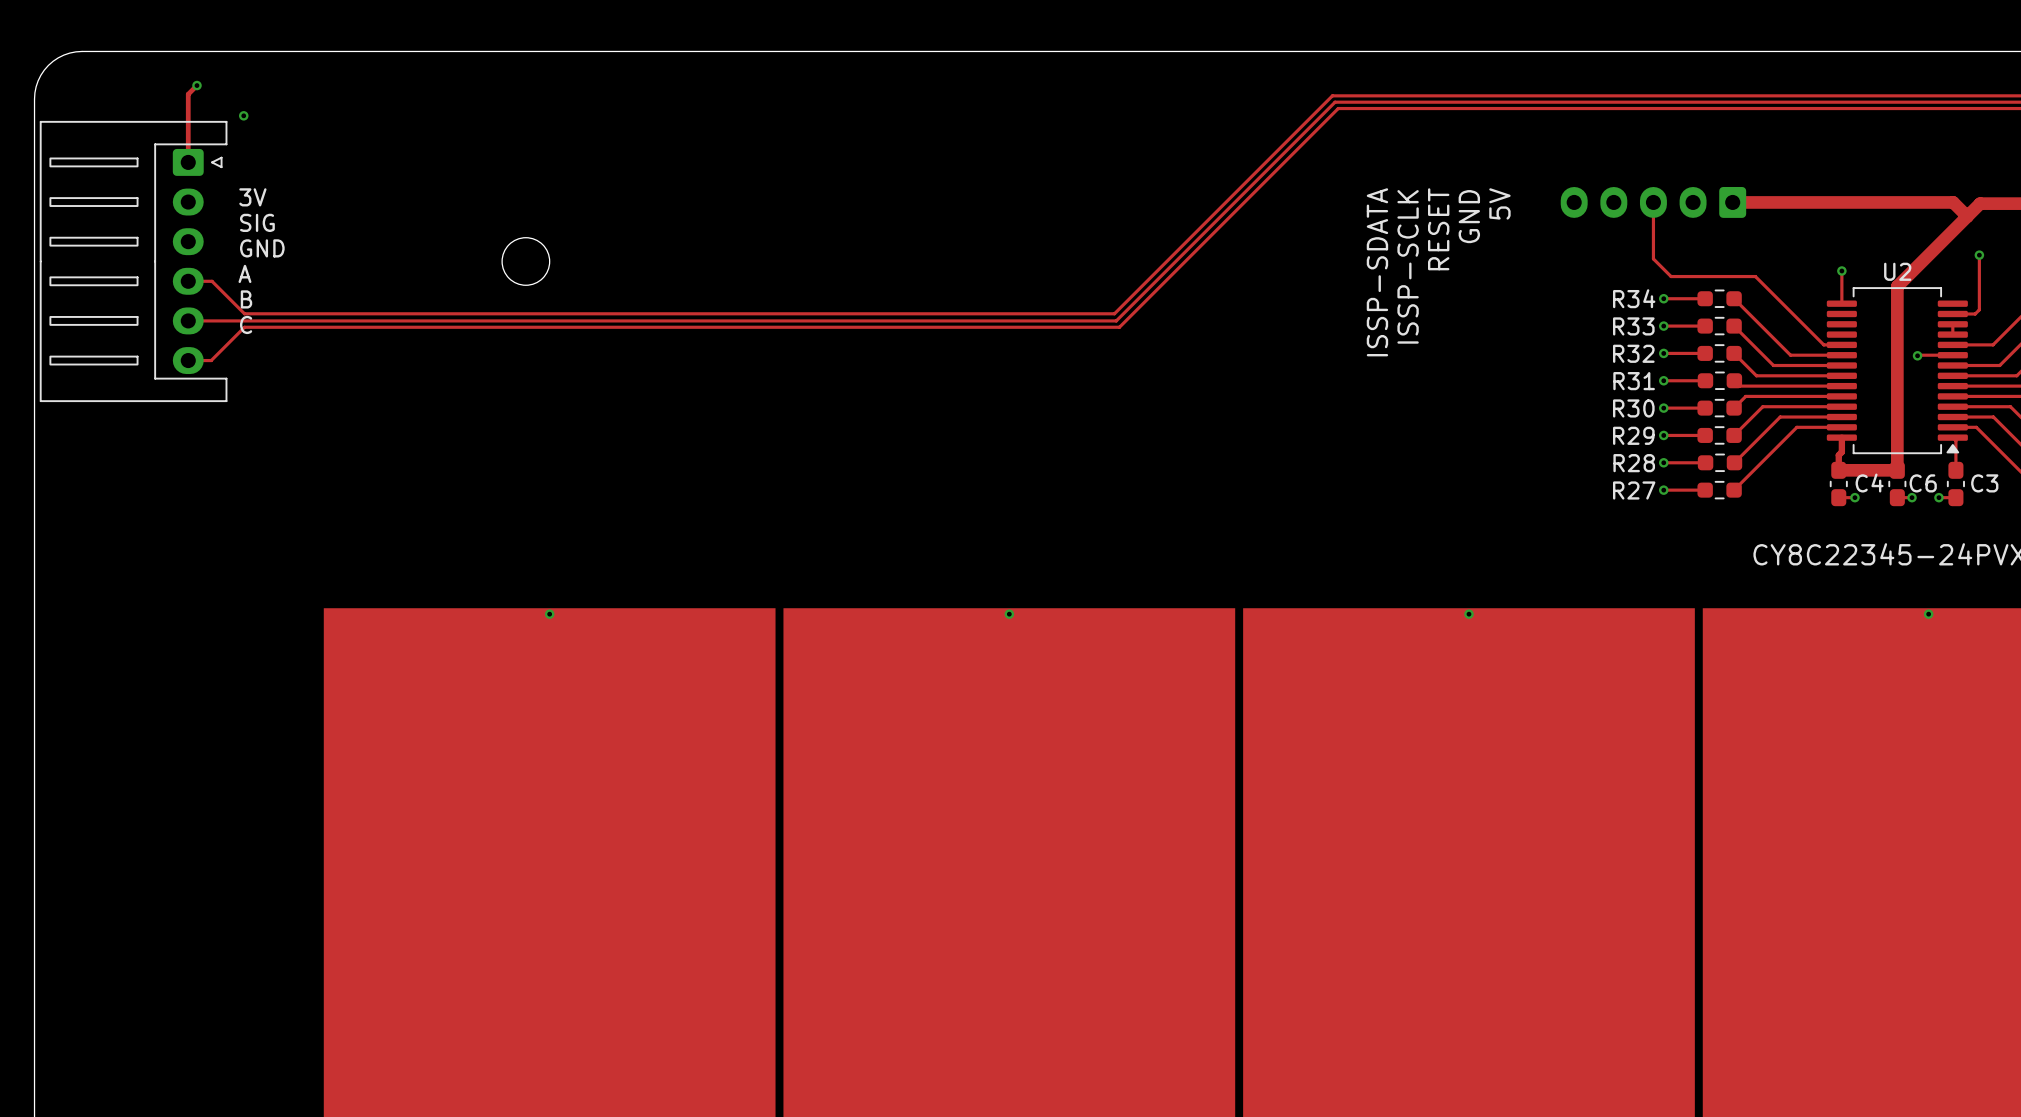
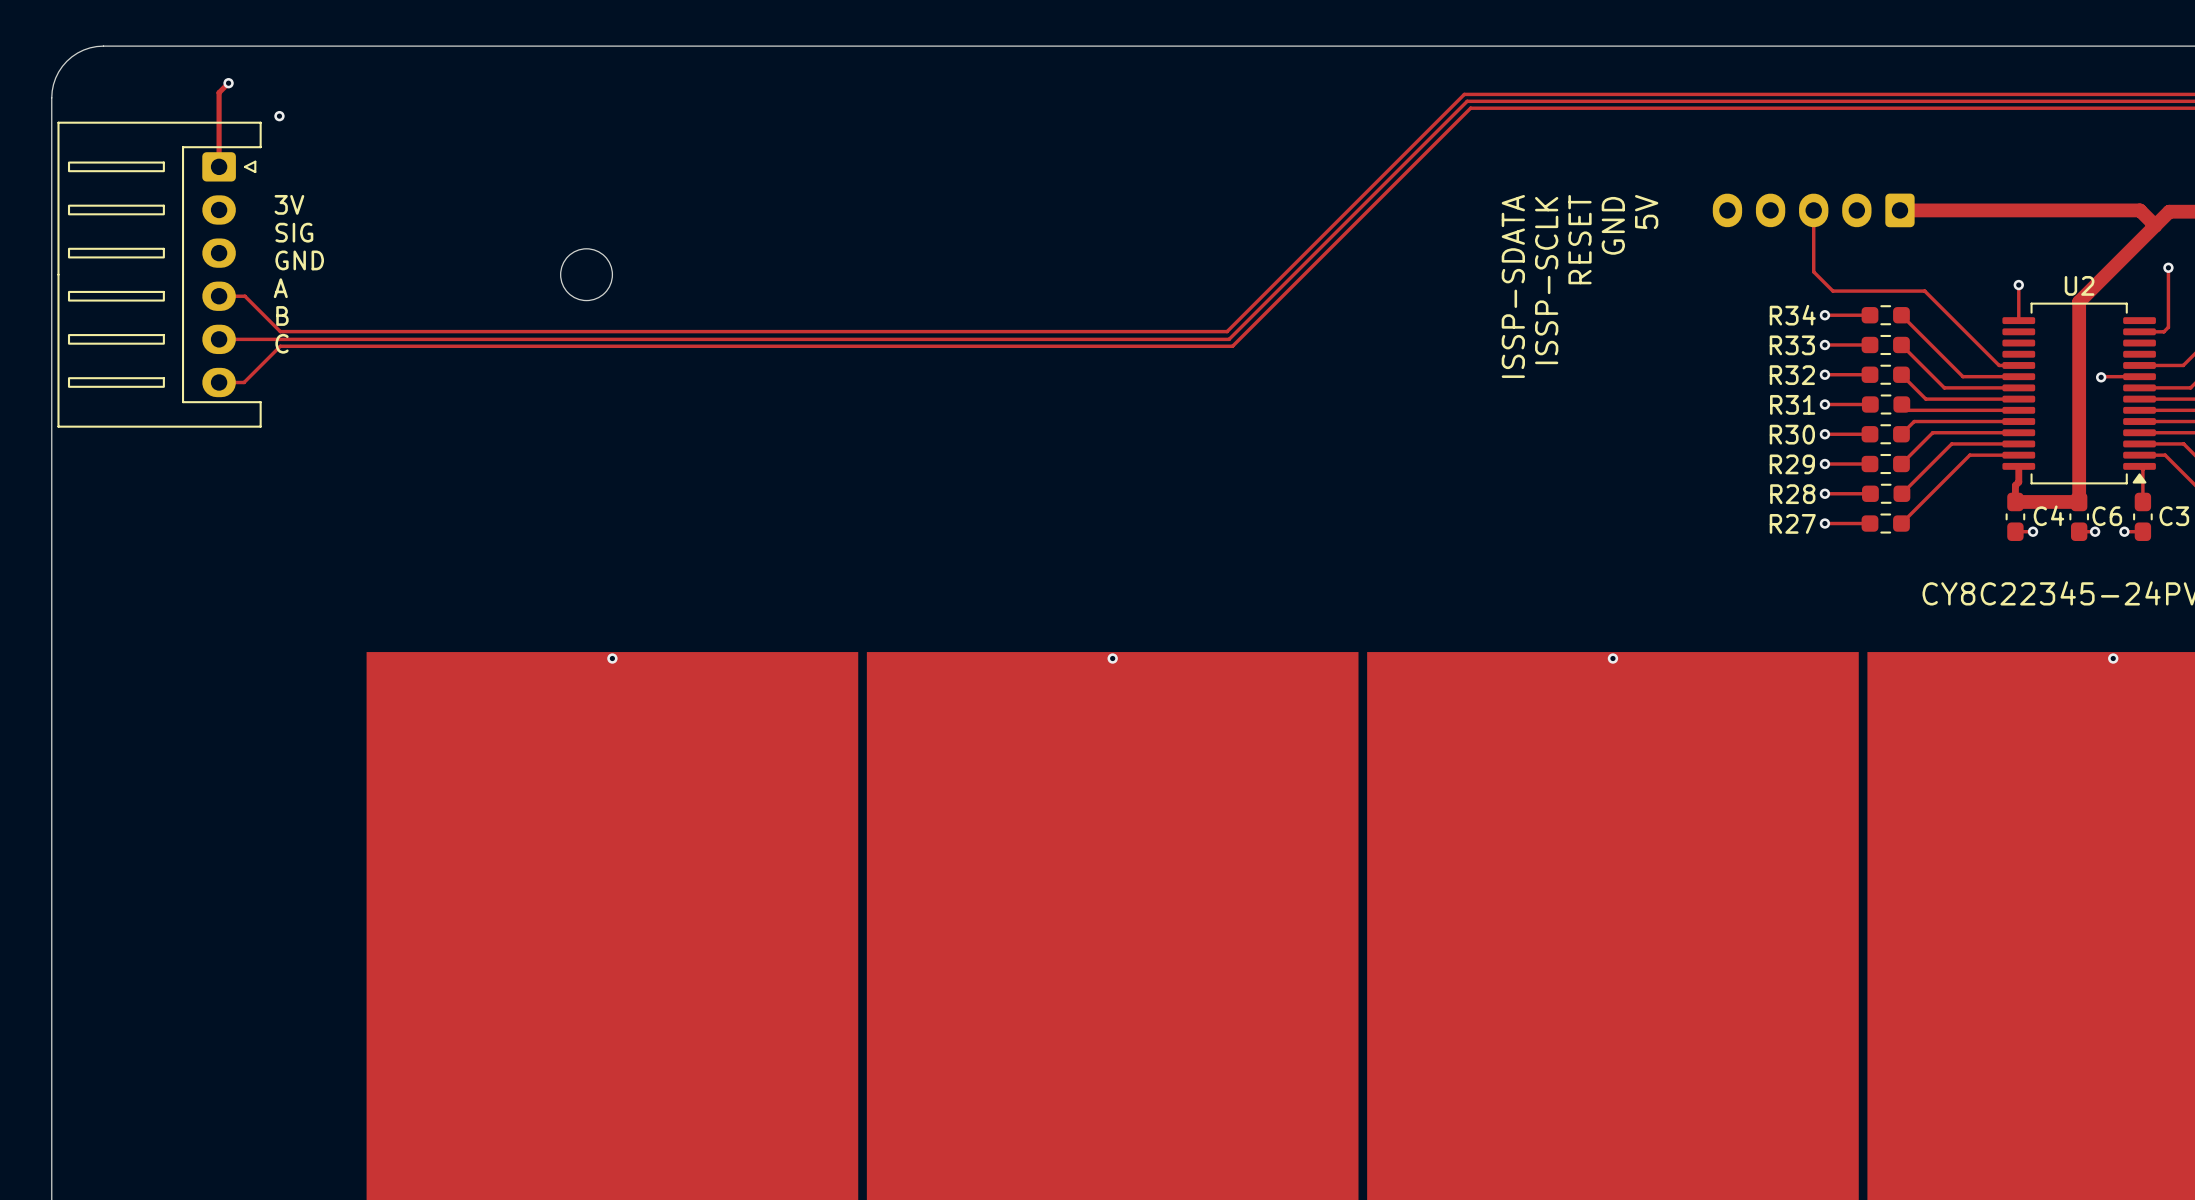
track: (1952, 324) (1952, 334) -> none

